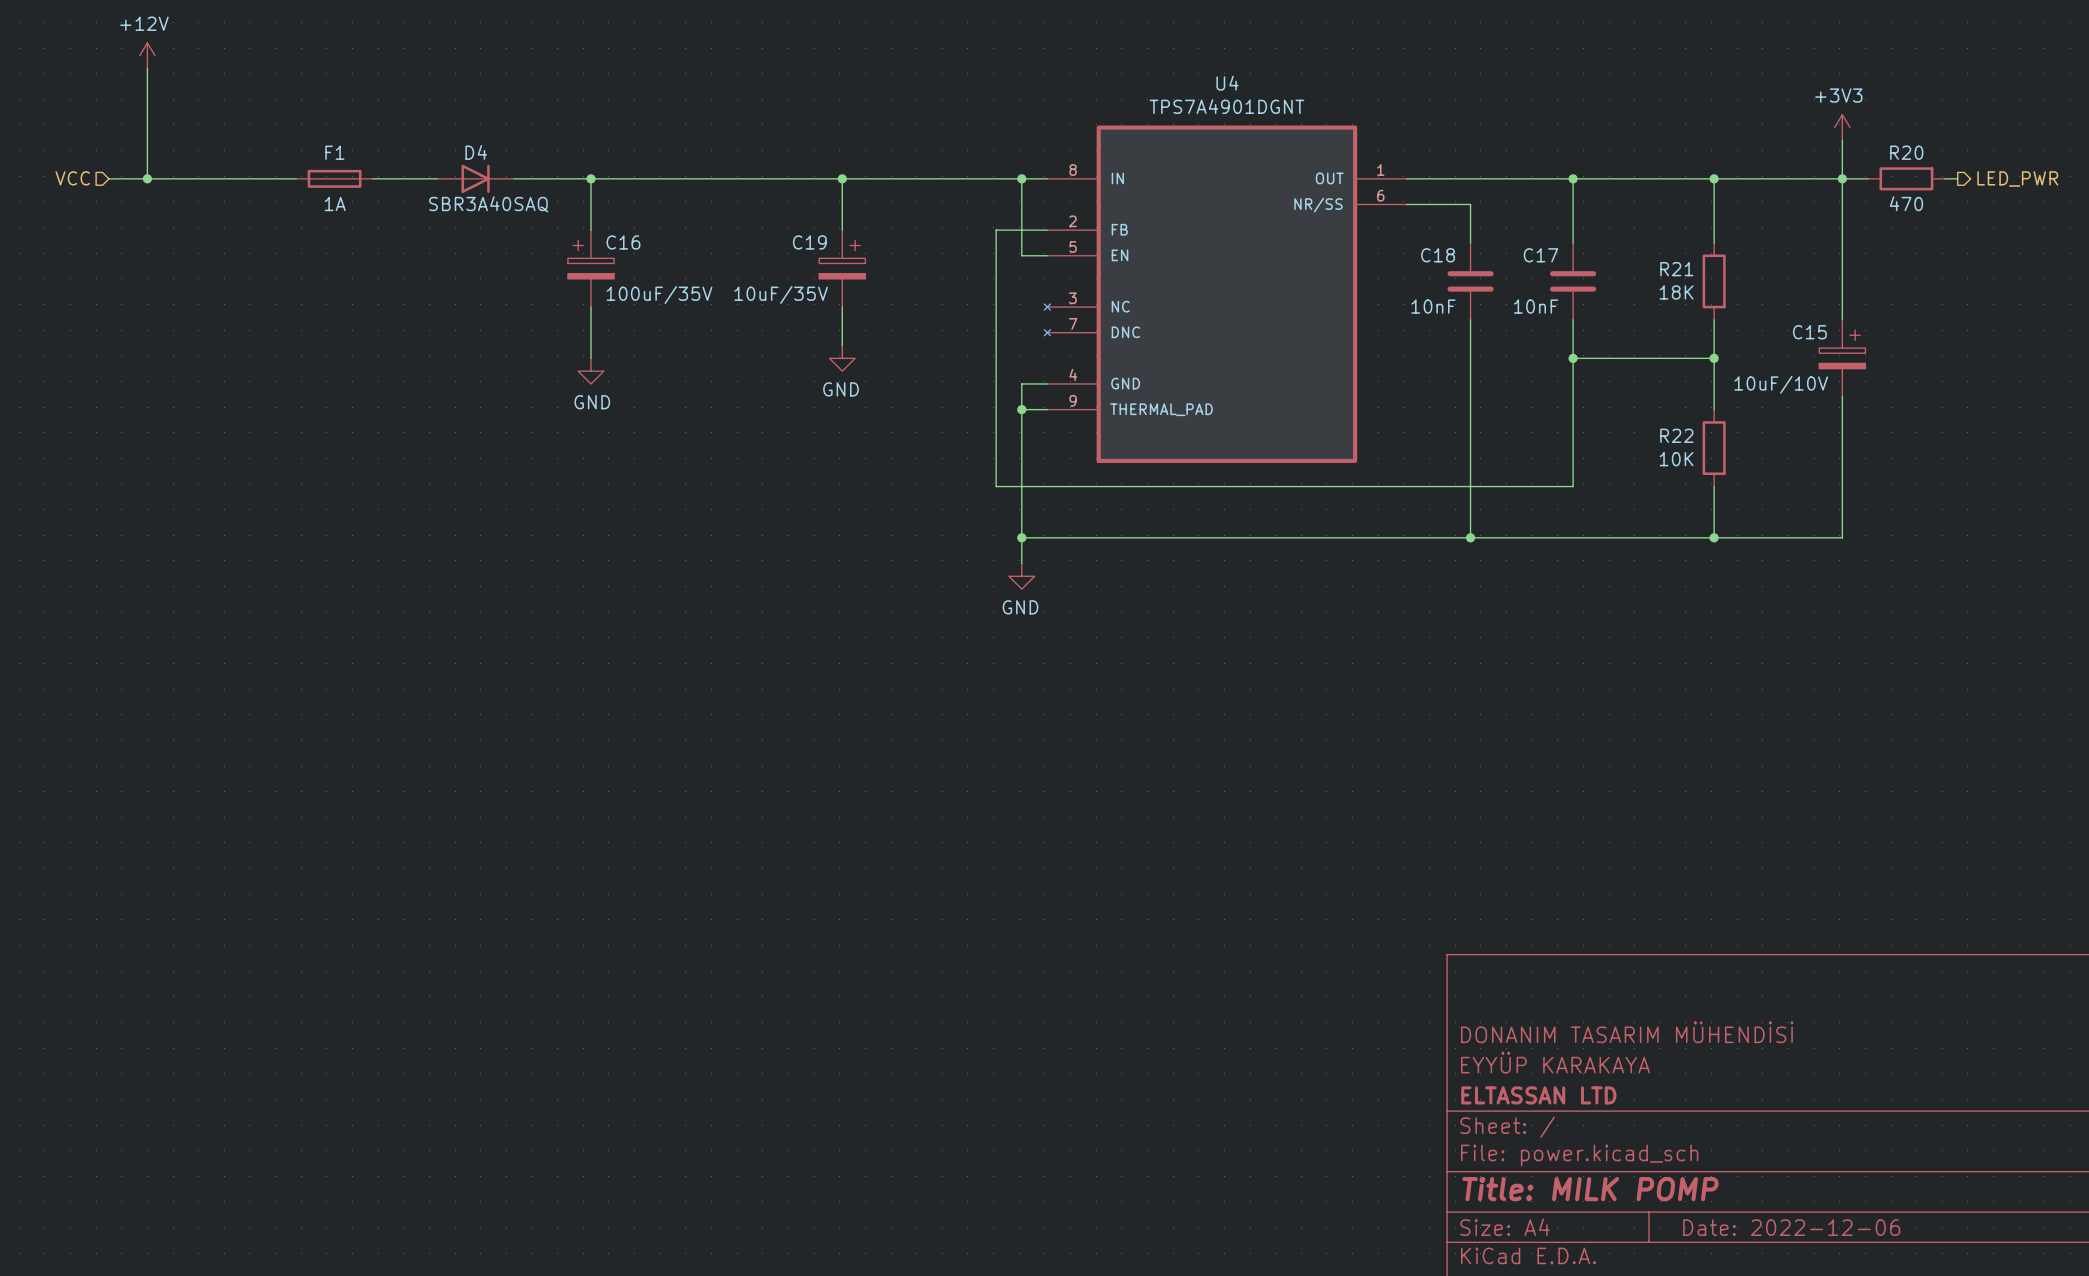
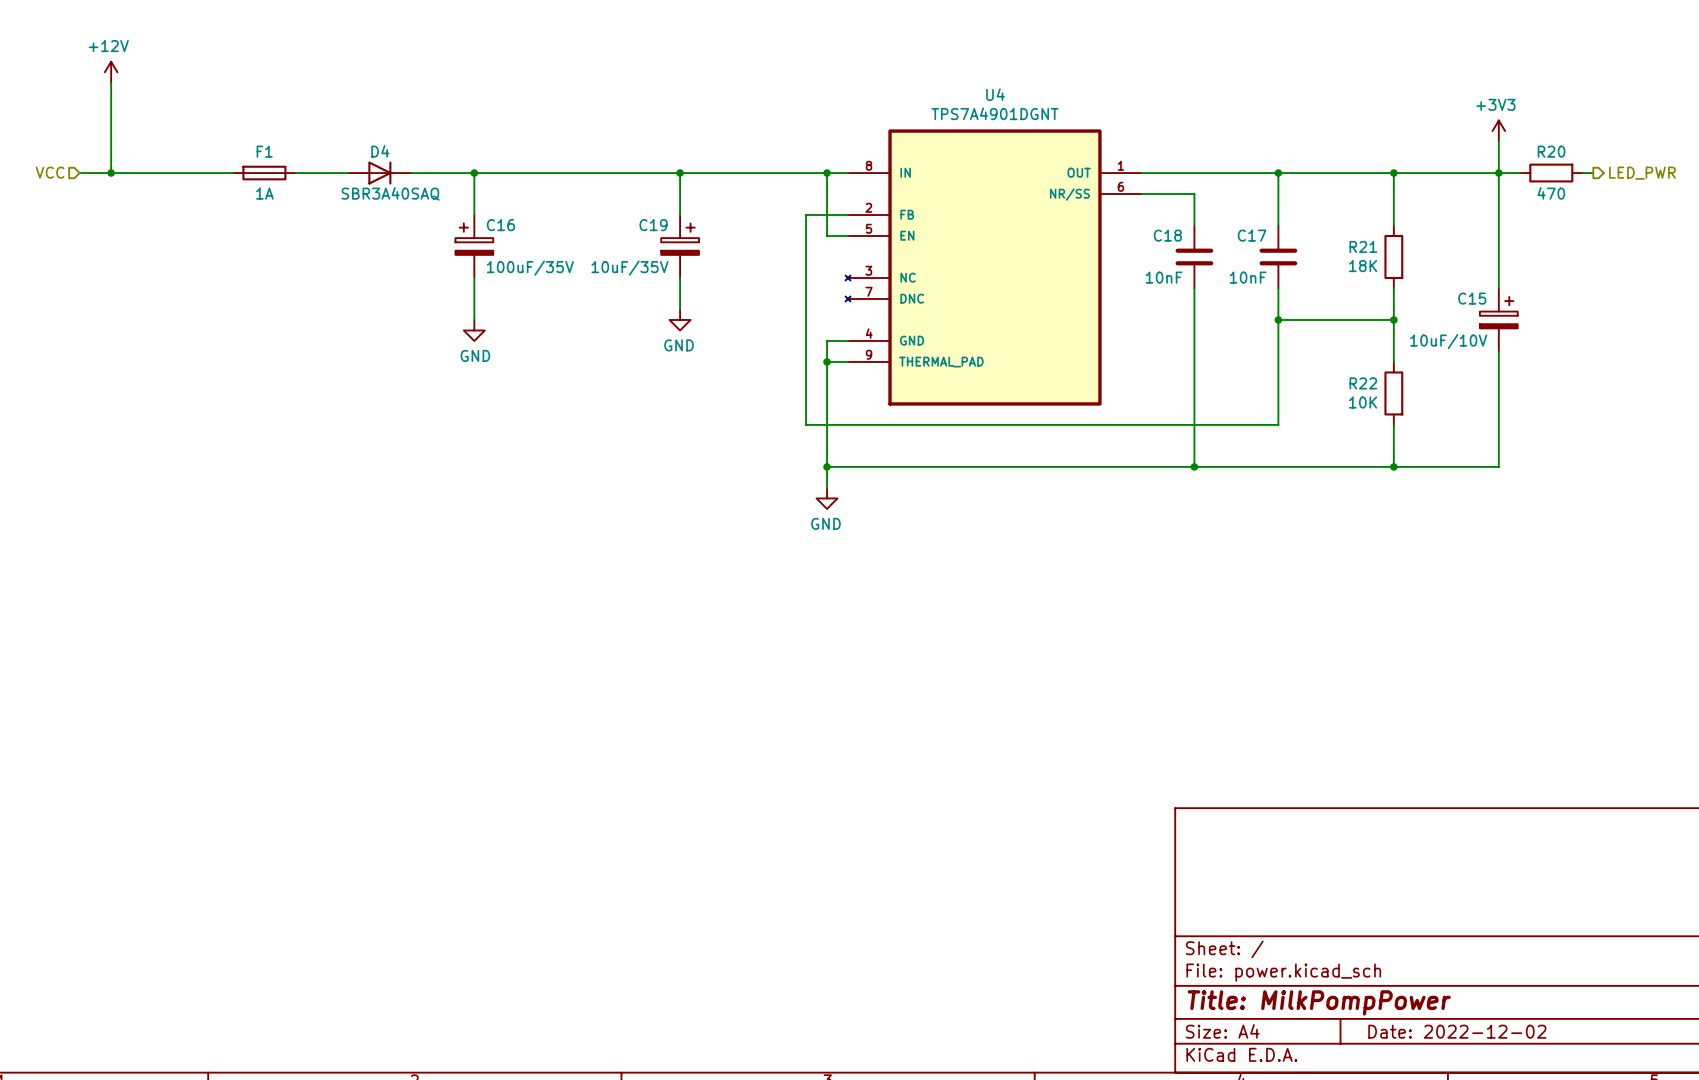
title block: DONANIM TASARIM MÜHENDİSİ (1627, 1032) -> none
title block: EYYÜP KARAKAYA (1555, 1062) -> none
title block: ELTASSAN LTD (1538, 1095) -> none
title block: Title: MILK POMP (1590, 1189) -> Title: MilkPompPower (1319, 1002)
title block: Date: 2022-12-06 (1791, 1227) -> Date: 2022-12-02 (1457, 1031)

